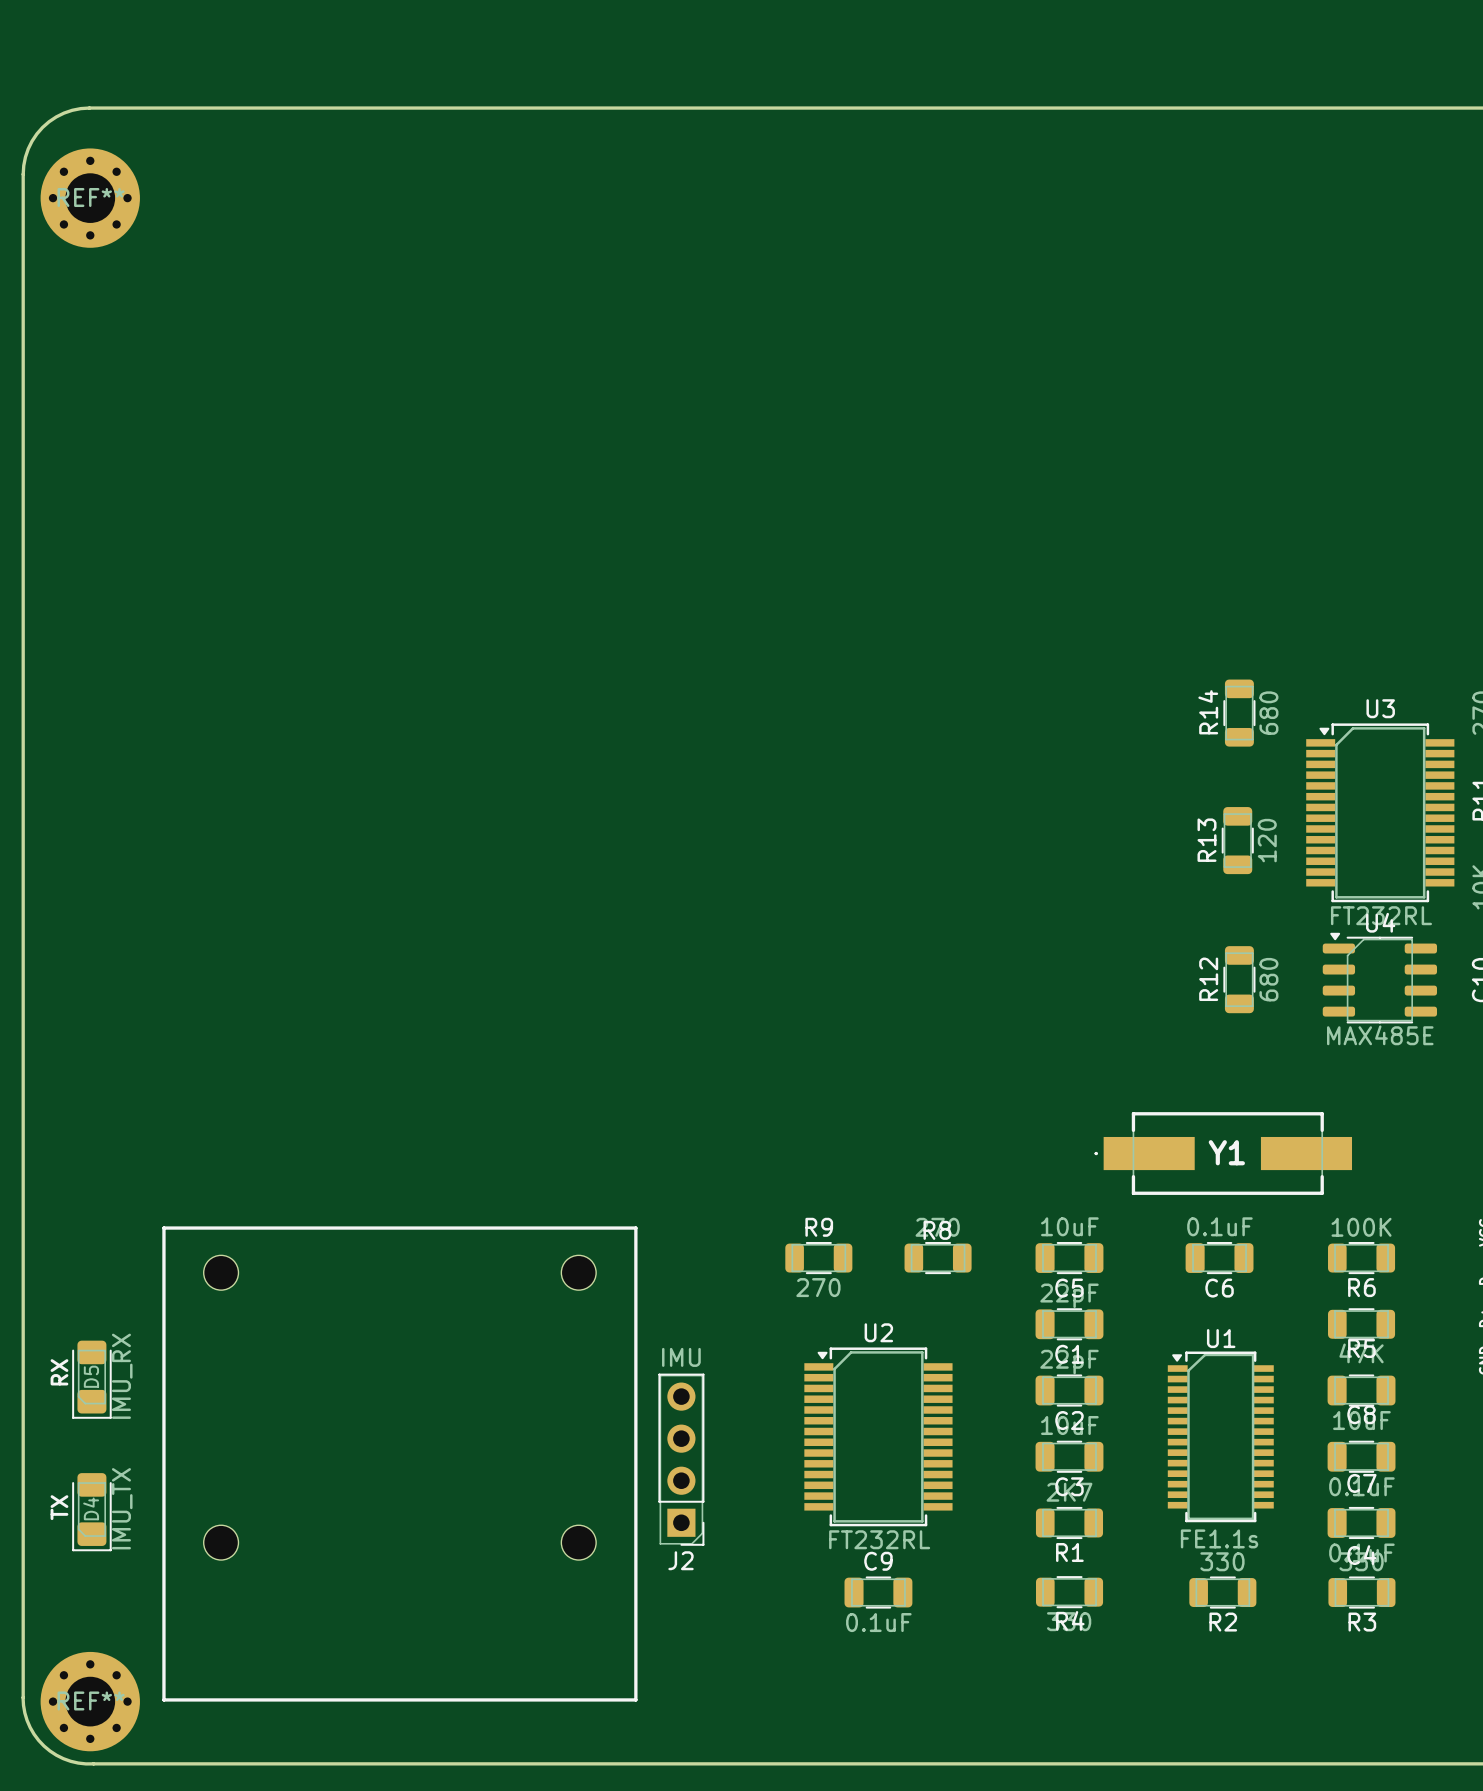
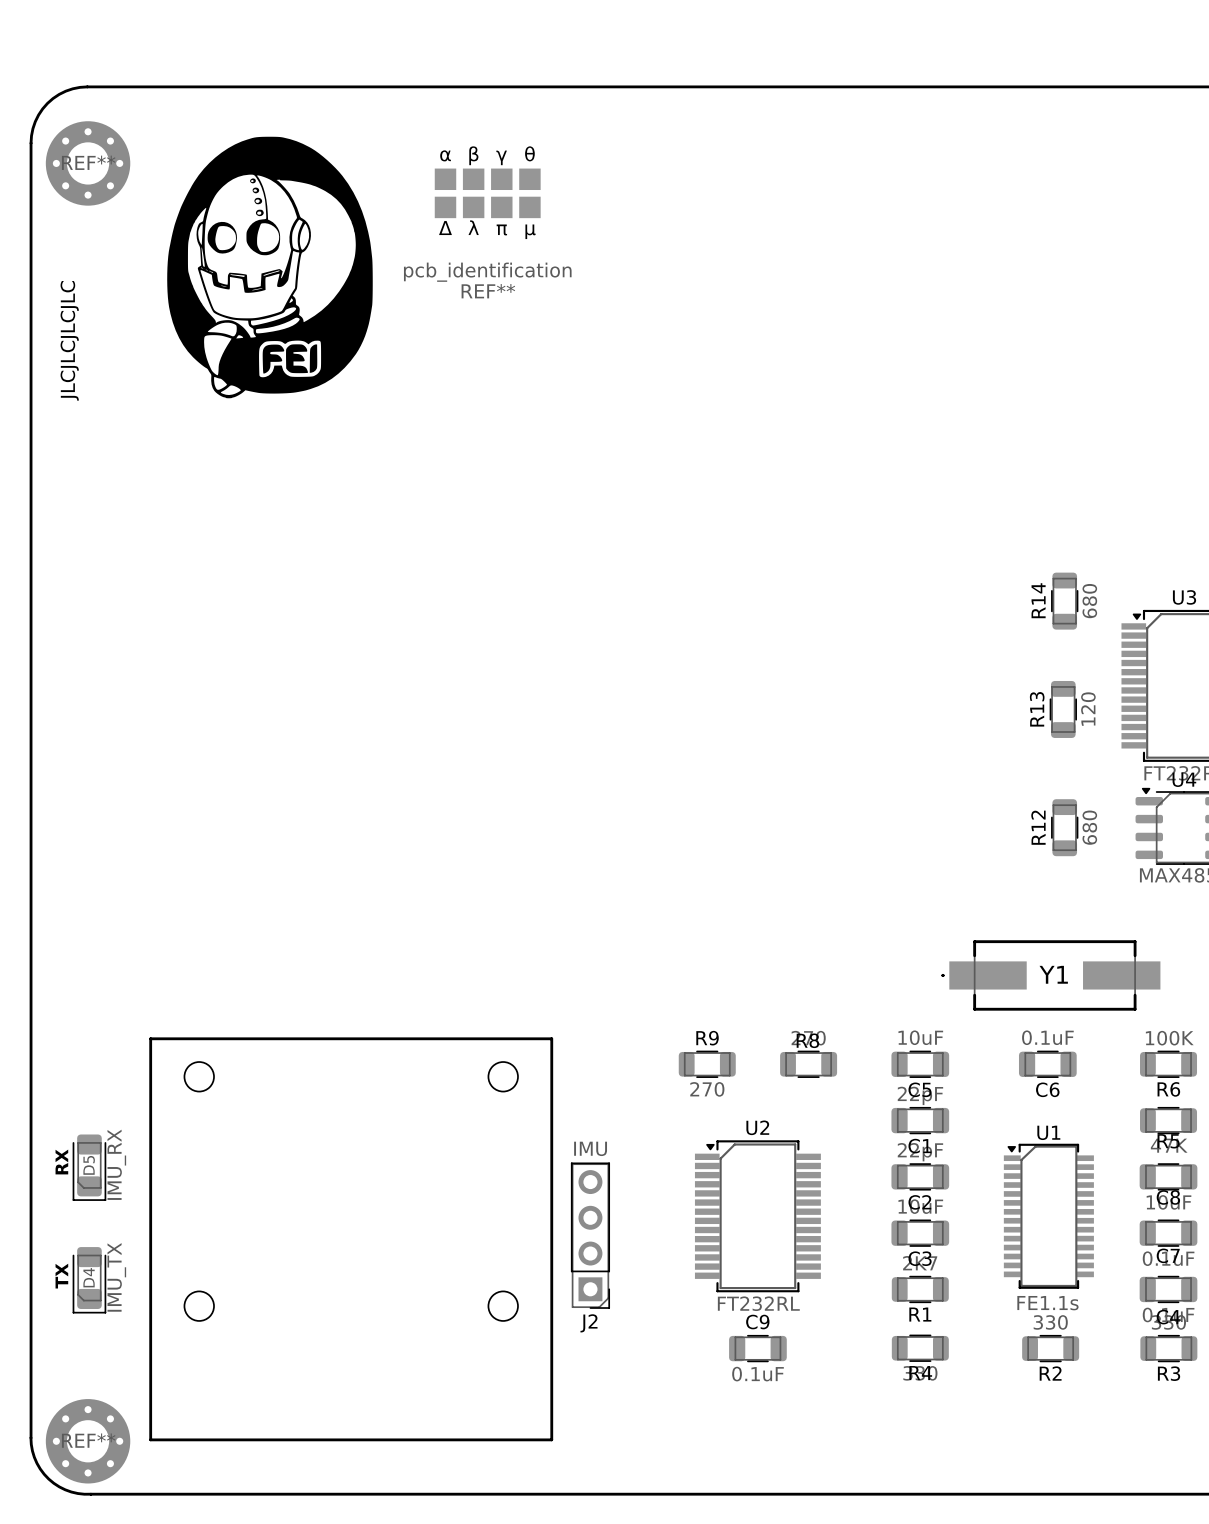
drawing: none -> [167, 136, 373, 399]
REF**: none -> pcb_identification (487, 193)
text: none -> JLCJLCJLCJLC (69, 340)

